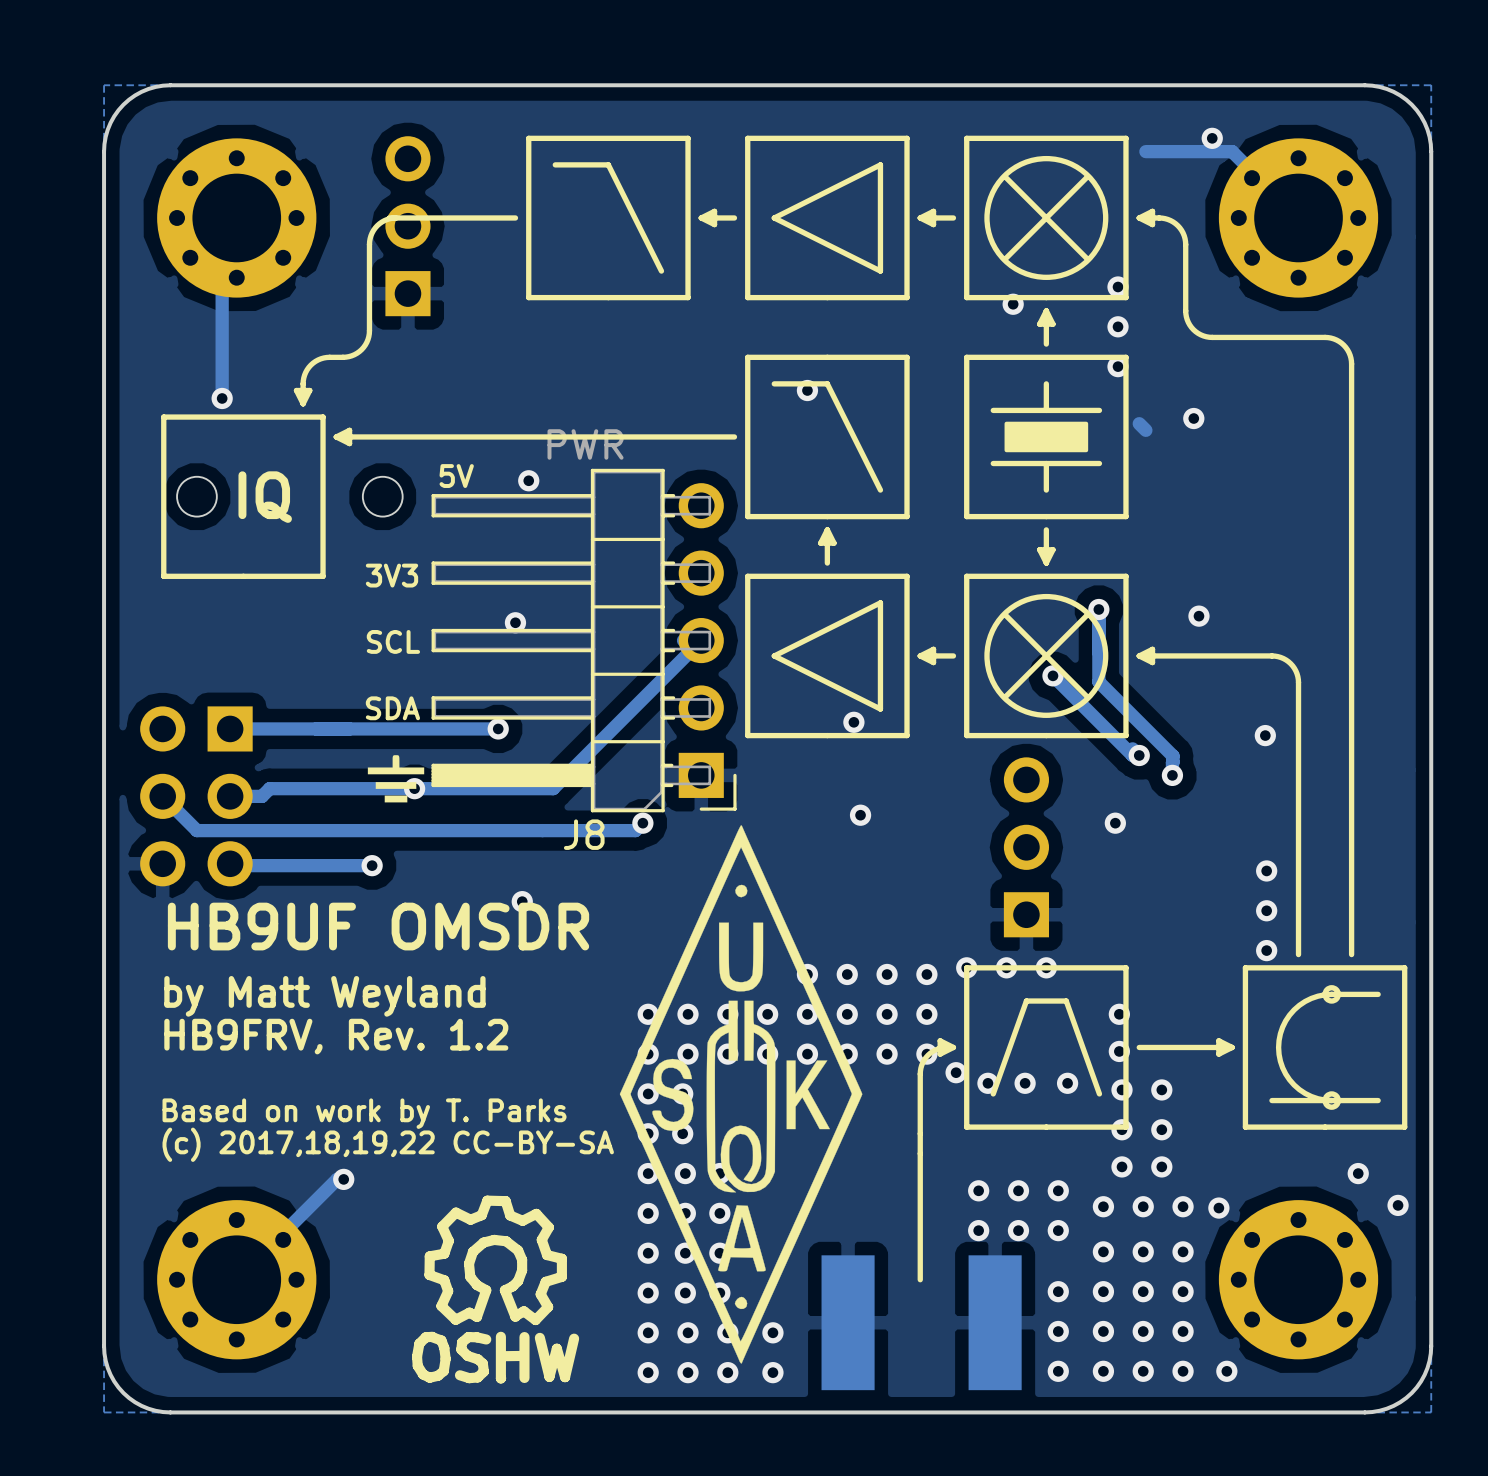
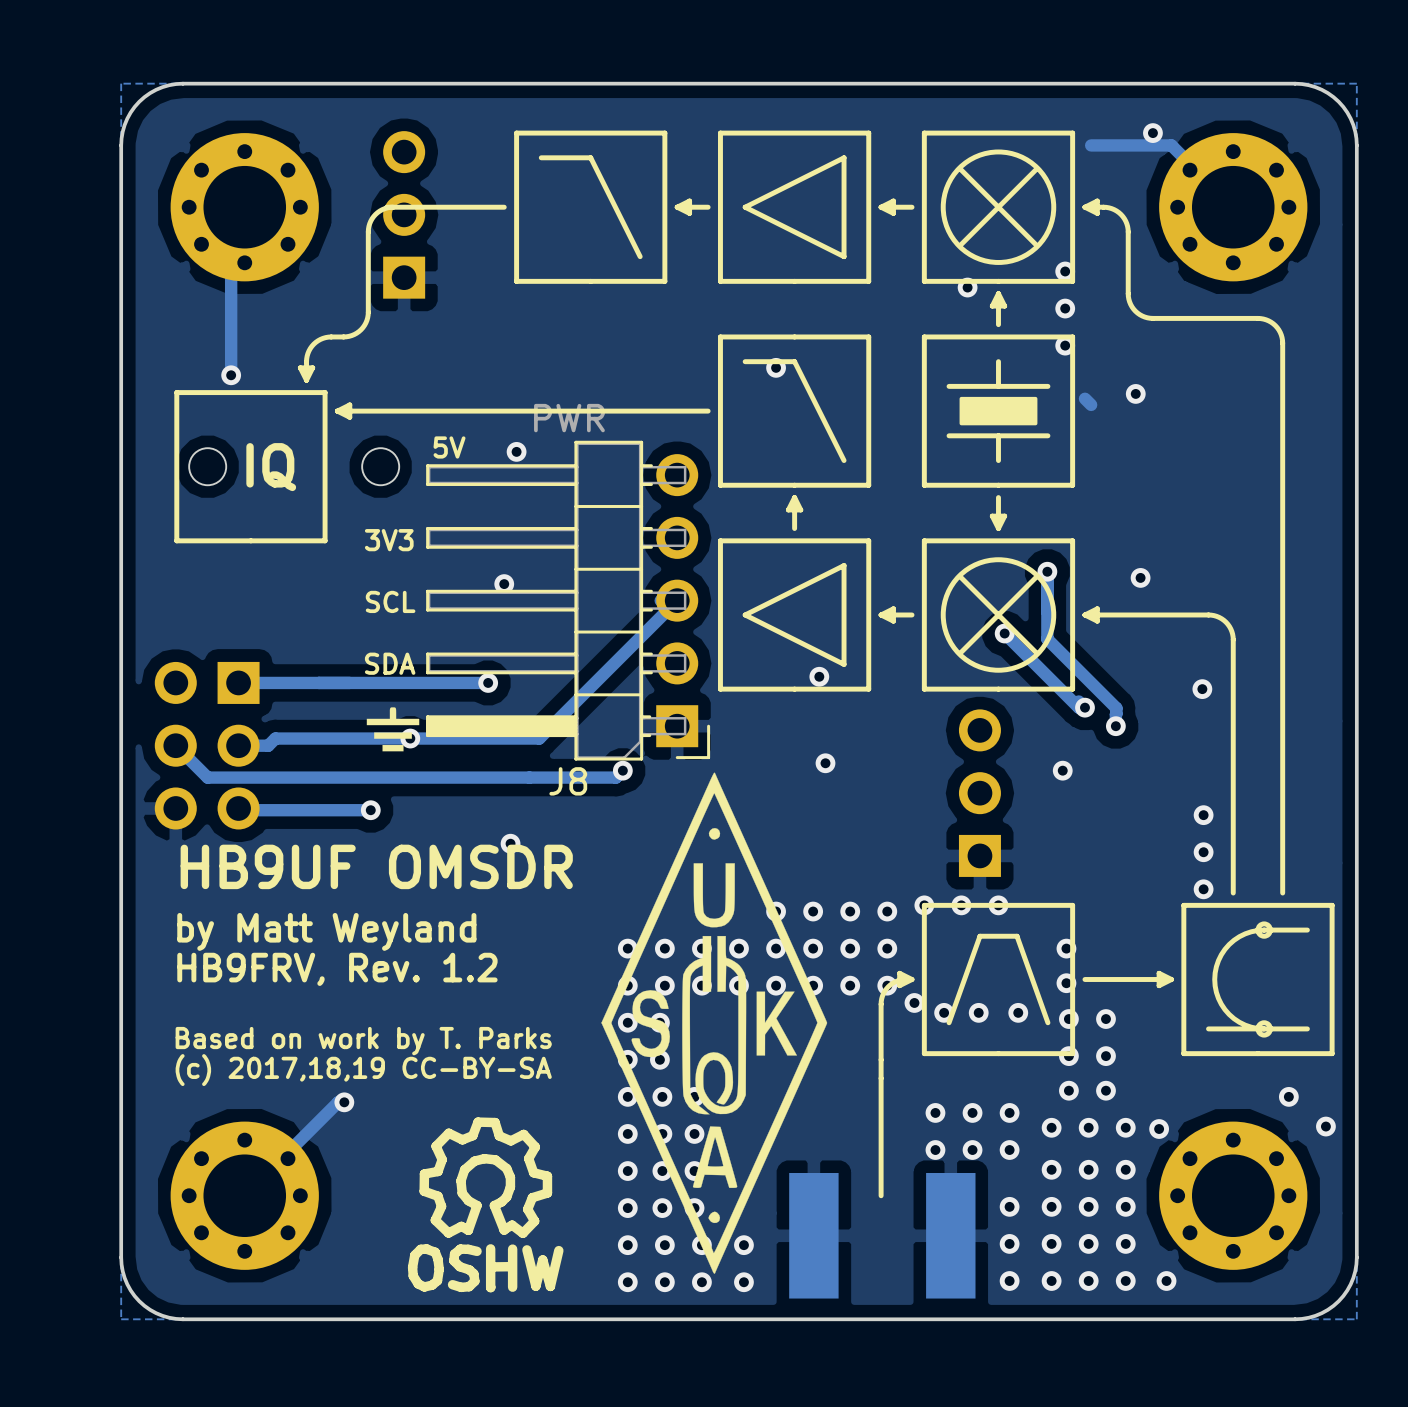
text: (c) 2017,18,19,22 CC-BY-SA (388, 1144) -> (c) 2017,18,19 CC-BY-SA (363, 1070)

